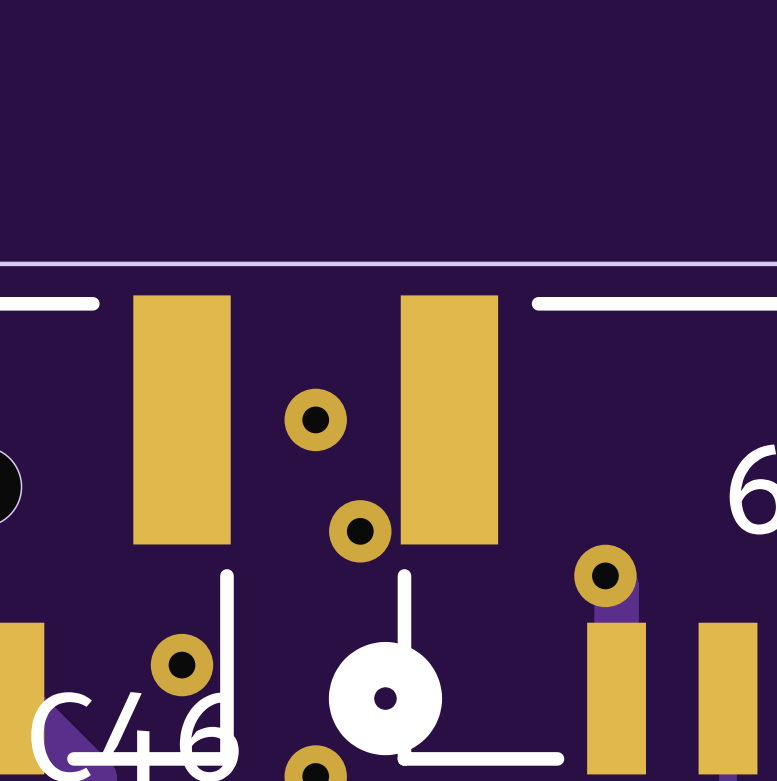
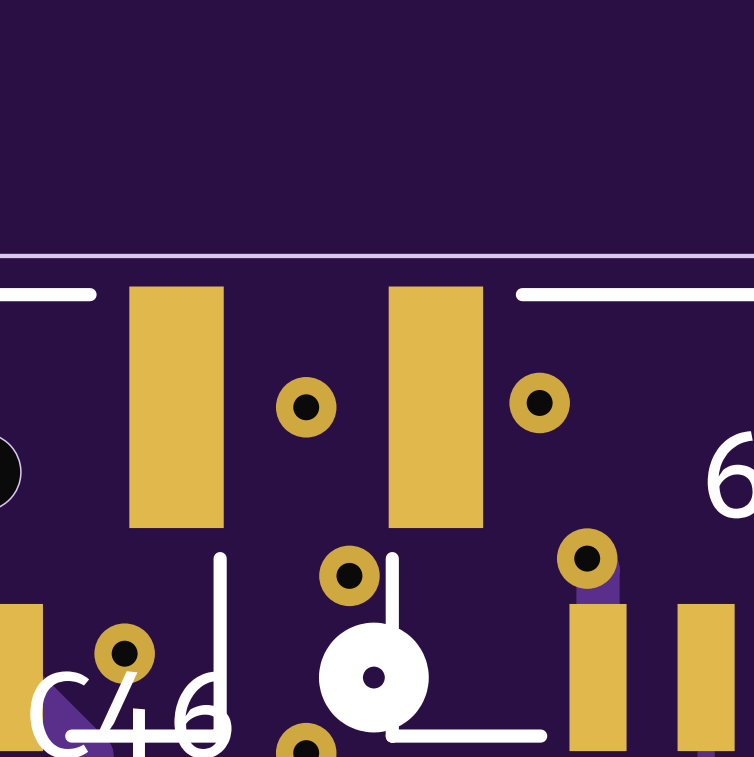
via: none -> (539, 402)
via position: (360, 531) -> (349, 575)
via position: (182, 665) -> (124, 653)

